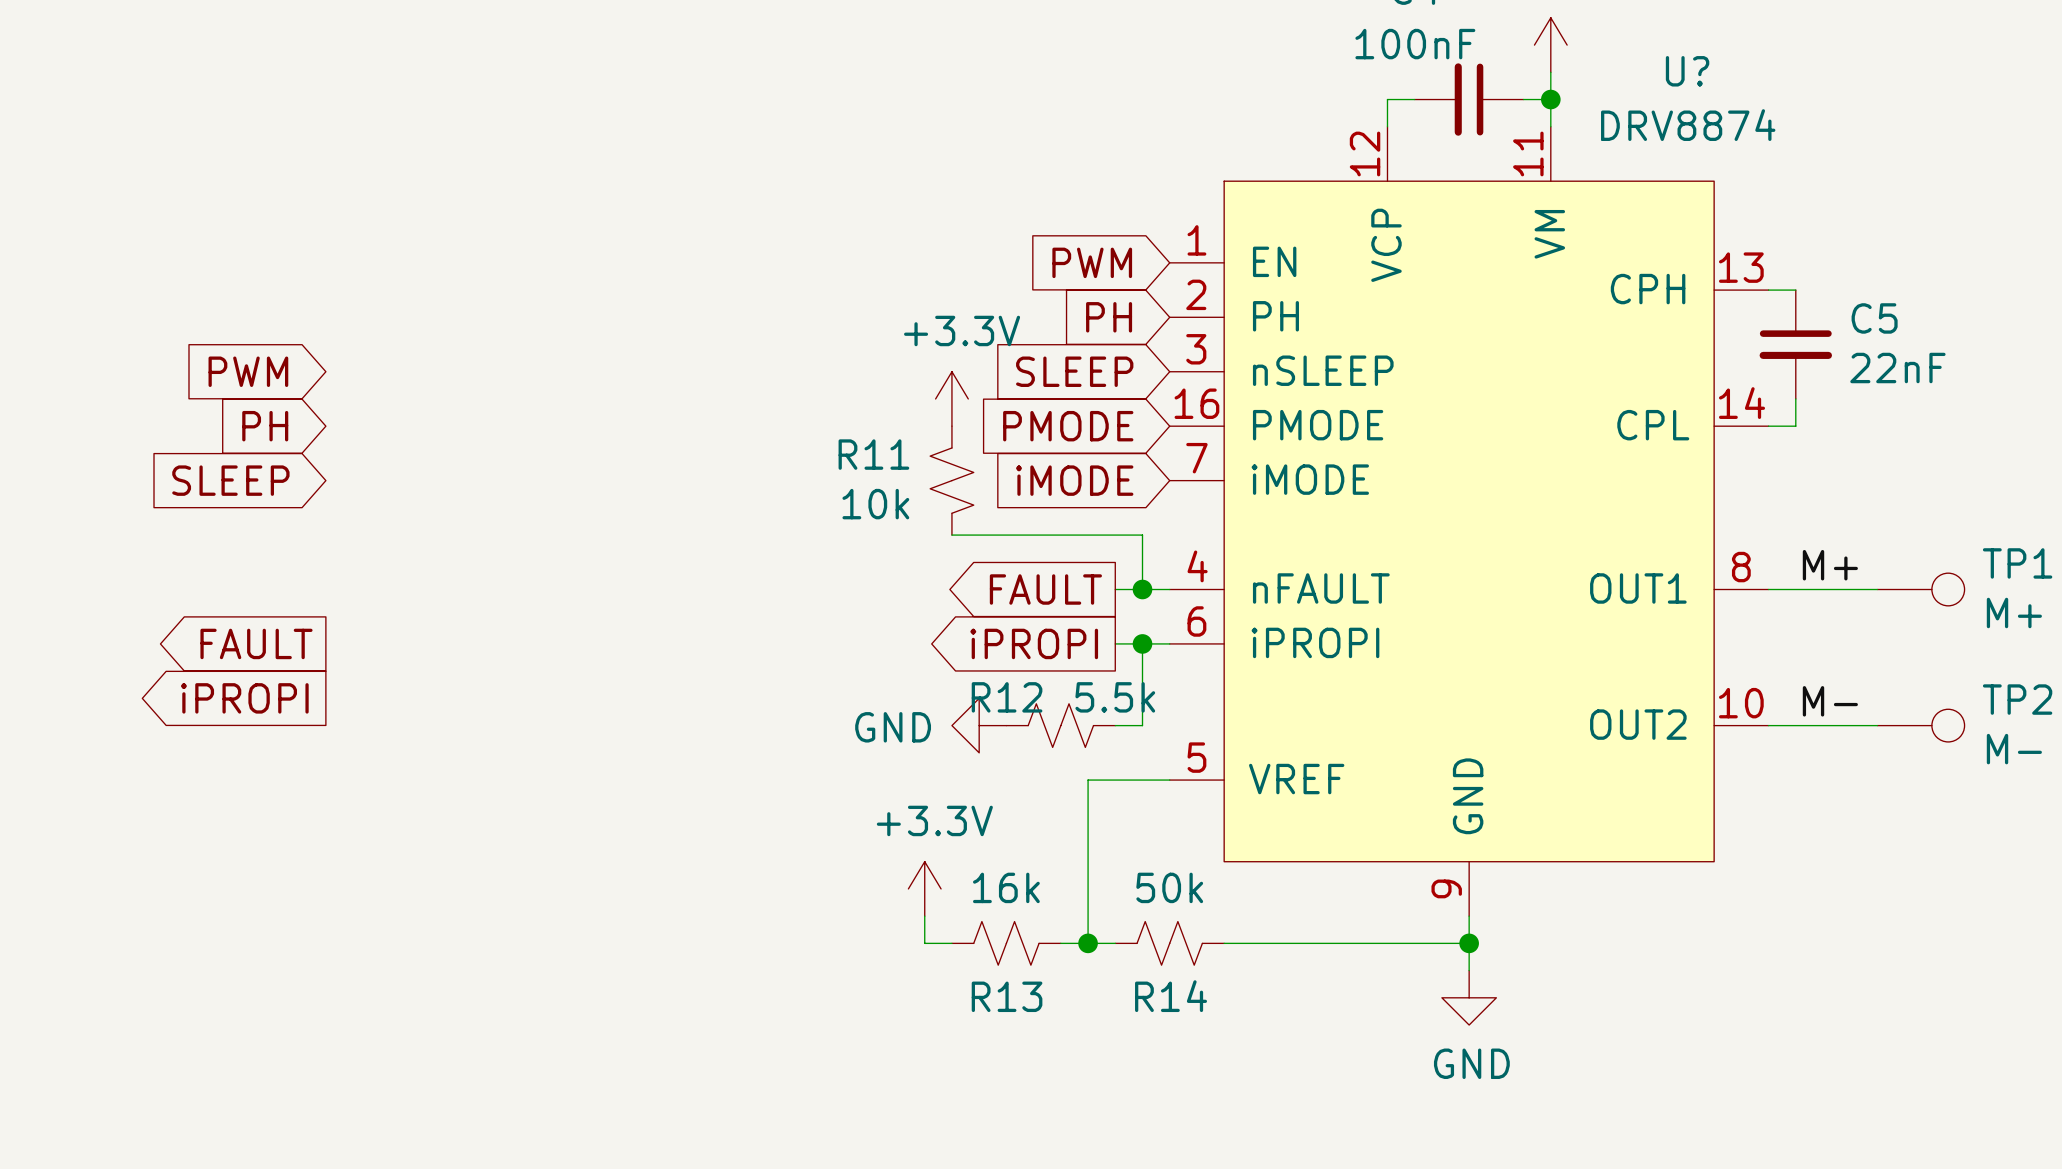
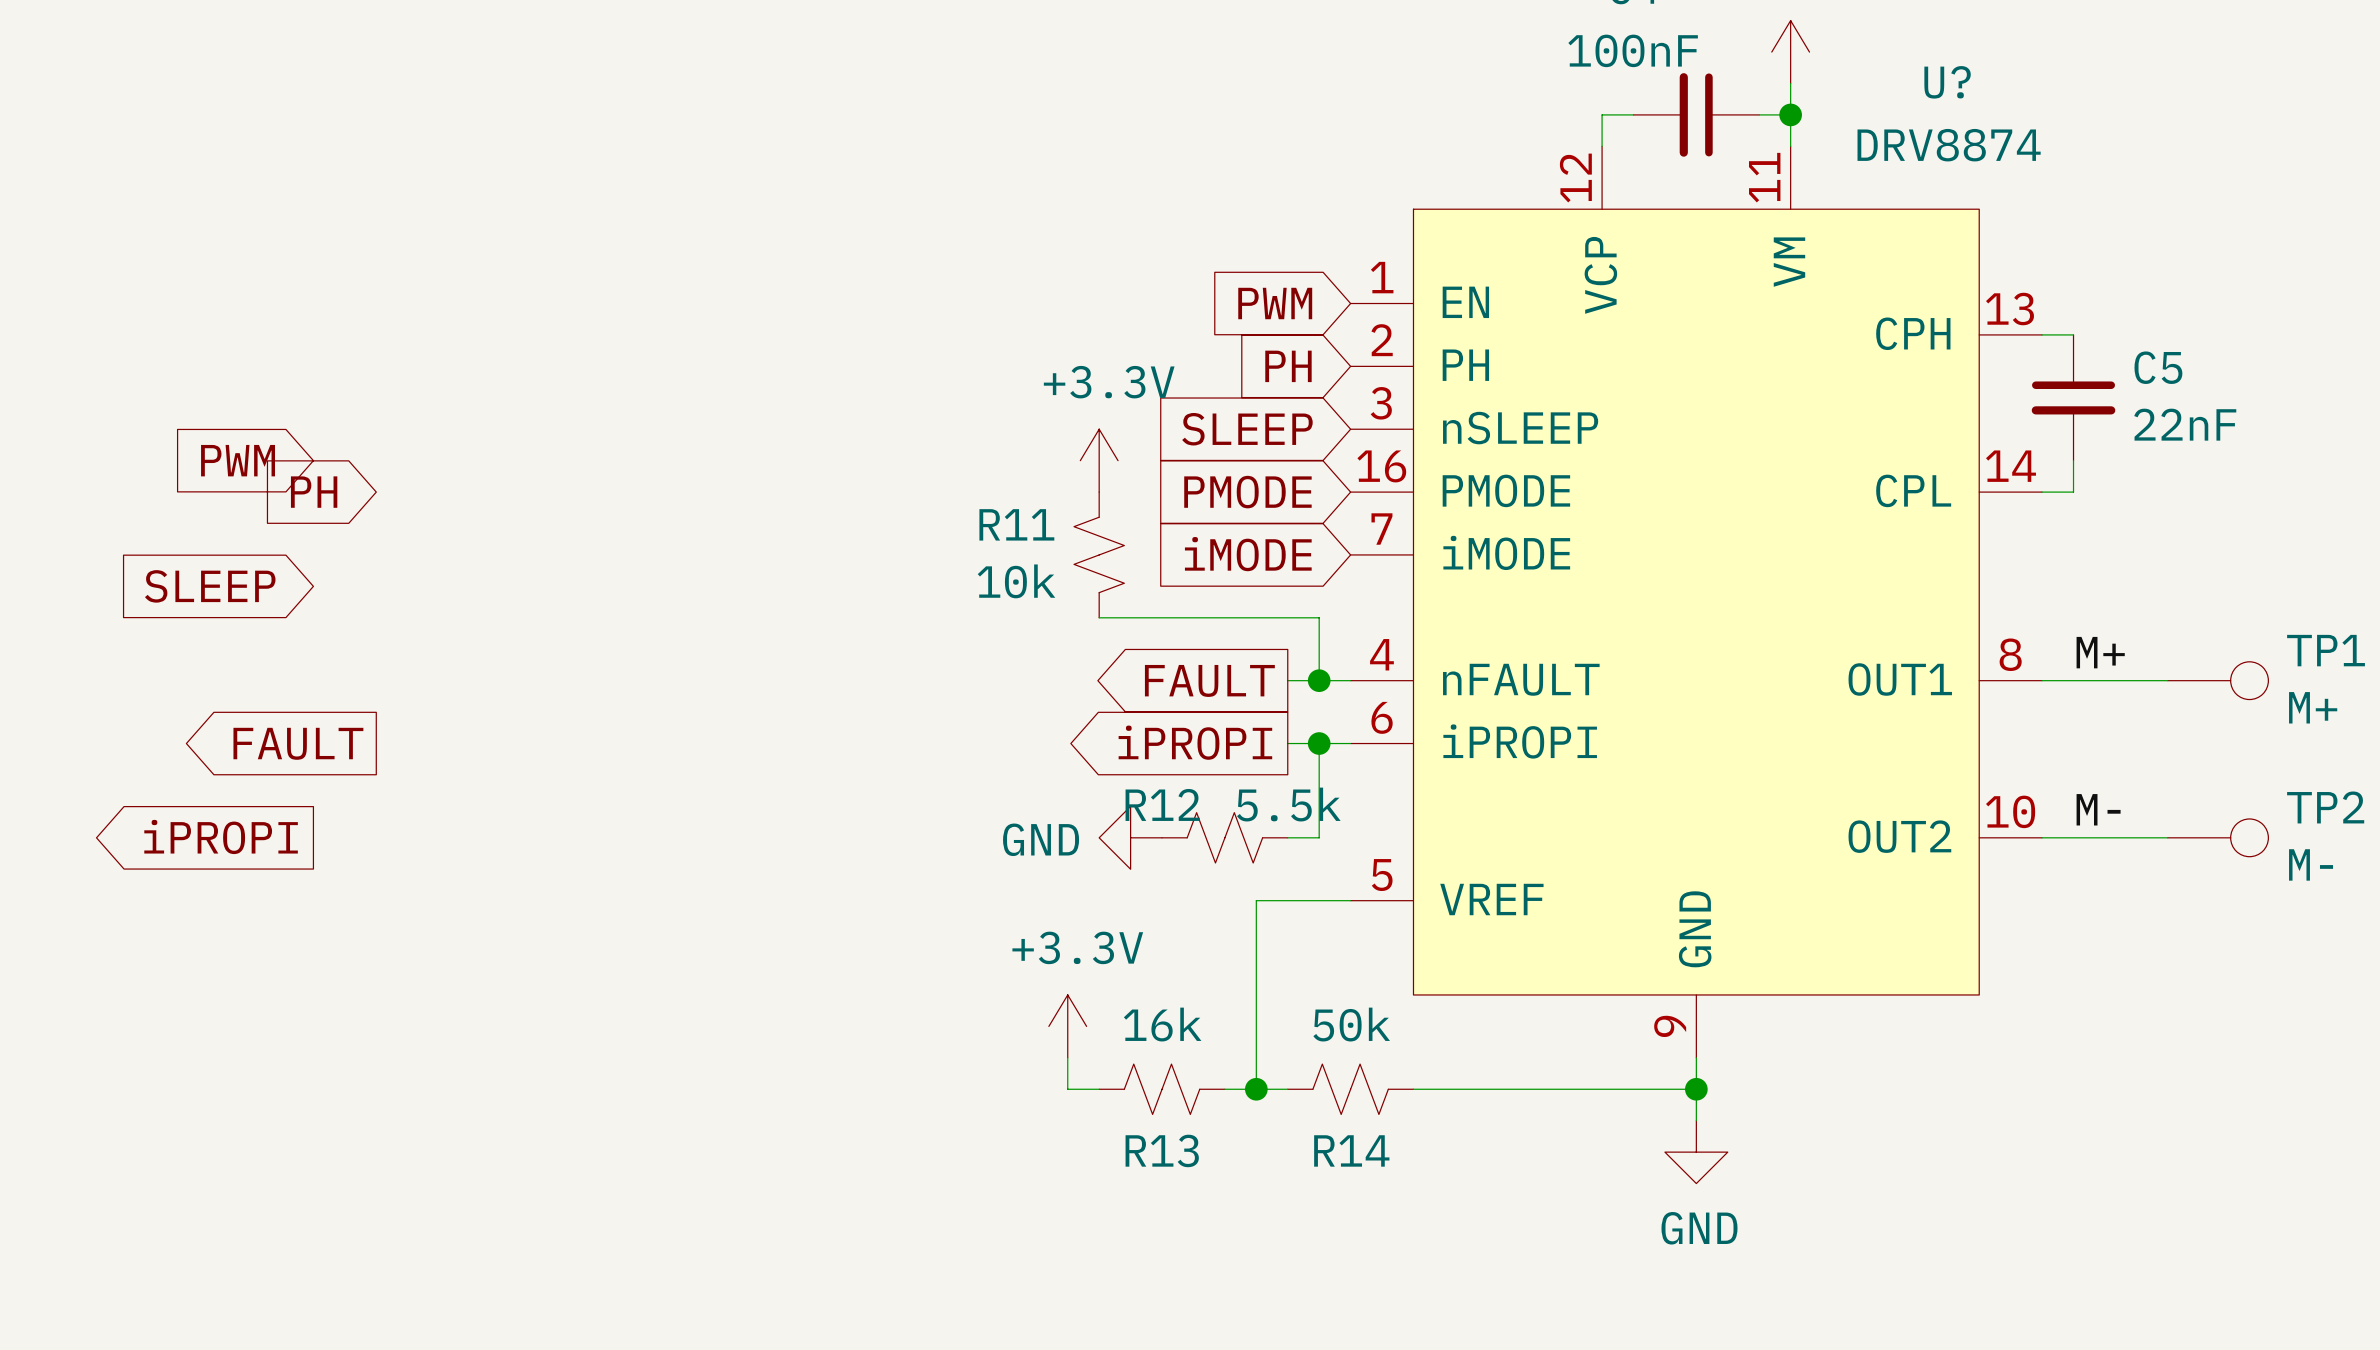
global label position: PWM (248, 371) -> PWM (238, 460)
global label position: SLEEP (230, 480) -> SLEEP (210, 586)
global label position: iPROPI (244, 698) -> iPROPI (221, 836)

